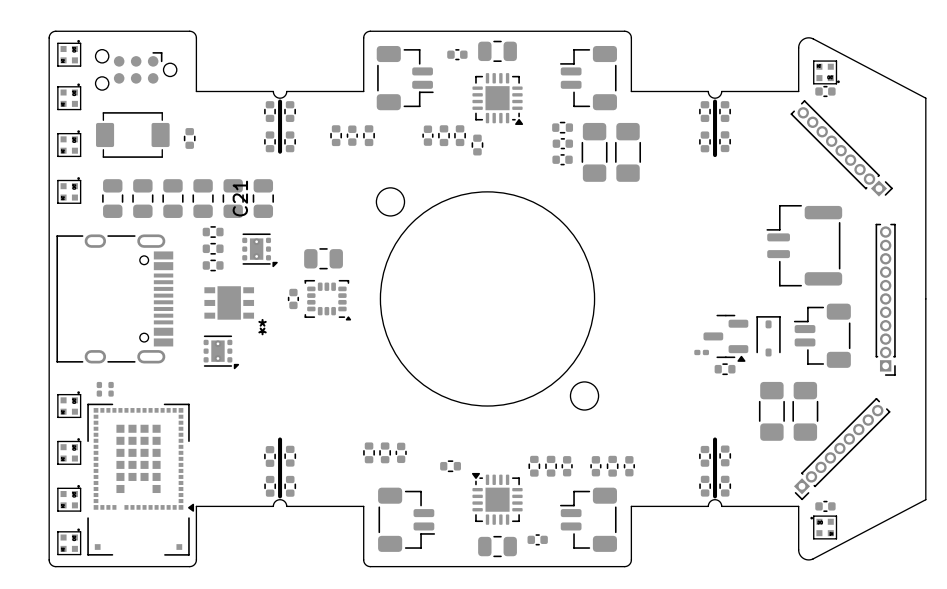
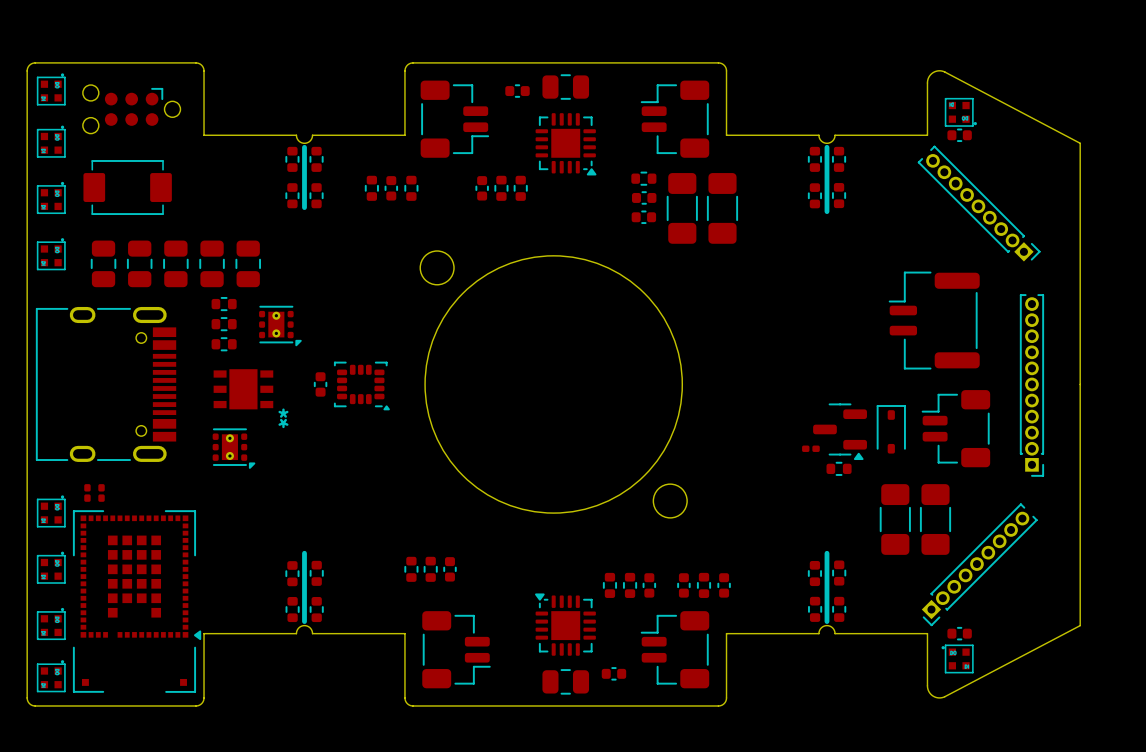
part: (189, 138) -> none
part: (477, 145) -> none
C21: (263, 198) -> none
part: (323, 258) -> none
part: (450, 466) -> none

